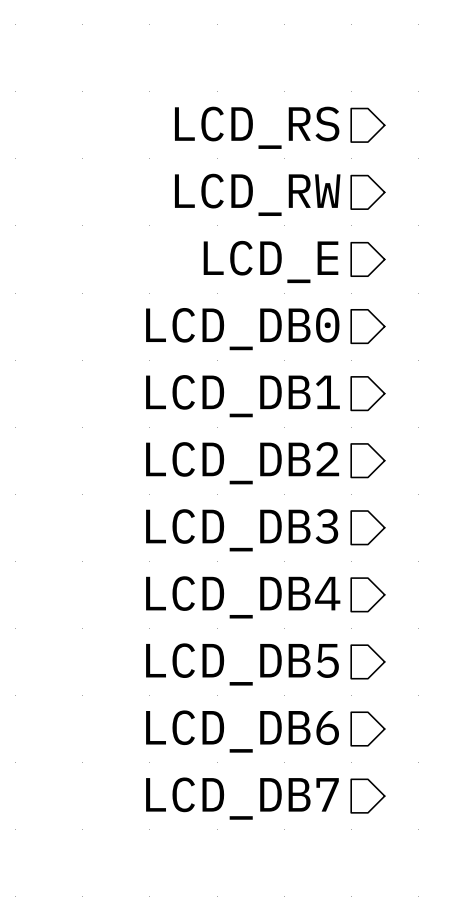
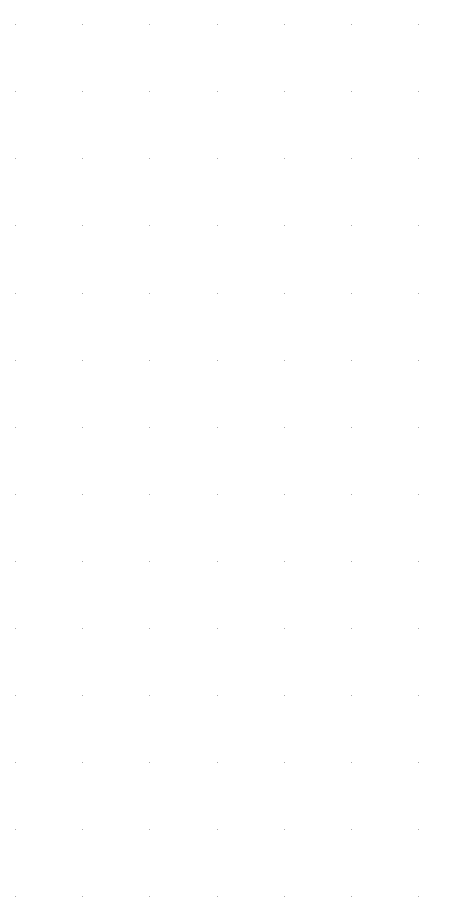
hierarchical label: LCD_RS (257, 127) -> none
hierarchical label: LCD_RW (257, 194) -> none
hierarchical label: LCD_E (271, 261) -> none
hierarchical label: LCD_DB0 (242, 329) -> none
hierarchical label: LCD_DB1 (242, 396) -> none
hierarchical label: LCD_DB2 (242, 463) -> none
hierarchical label: LCD_DB3 (242, 530) -> none
hierarchical label: LCD_DB4 (243, 597) -> none
hierarchical label: LCD_DB5 (242, 664) -> none
hierarchical label: LCD_DB6 (242, 731) -> none
hierarchical label: LCD_DB7 (242, 798) -> none

